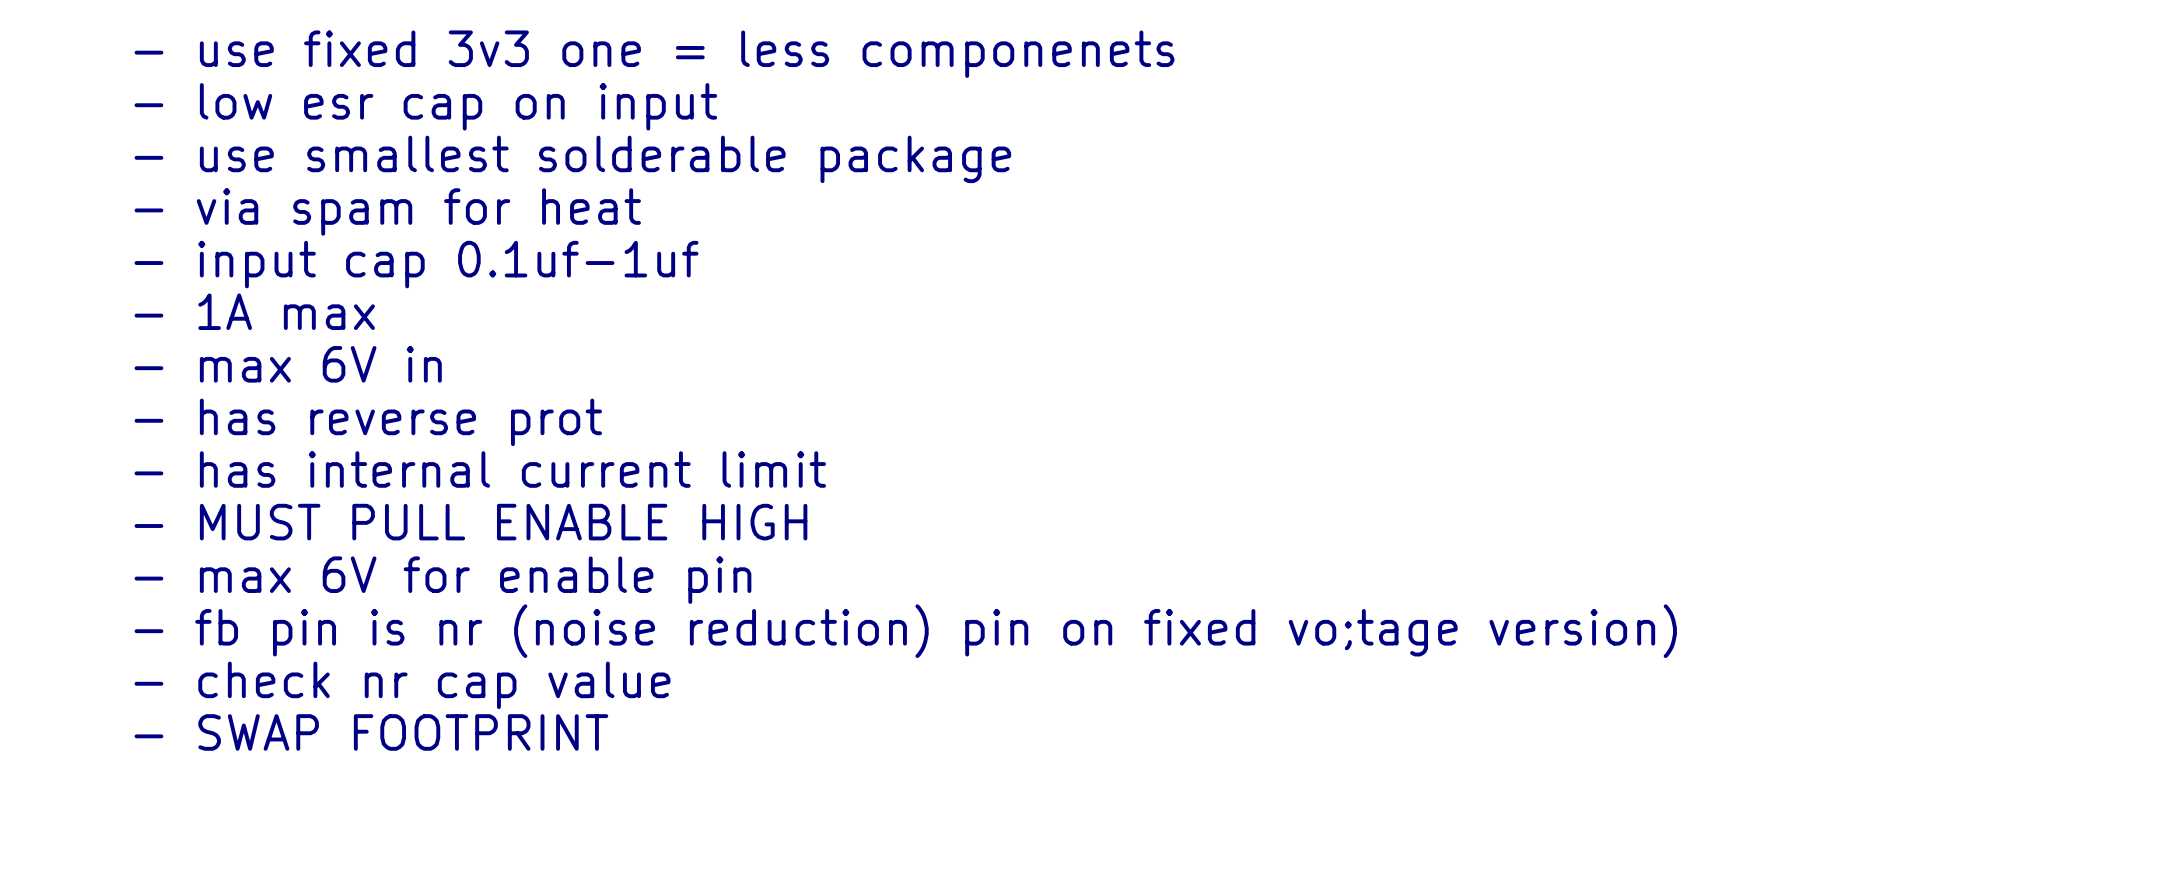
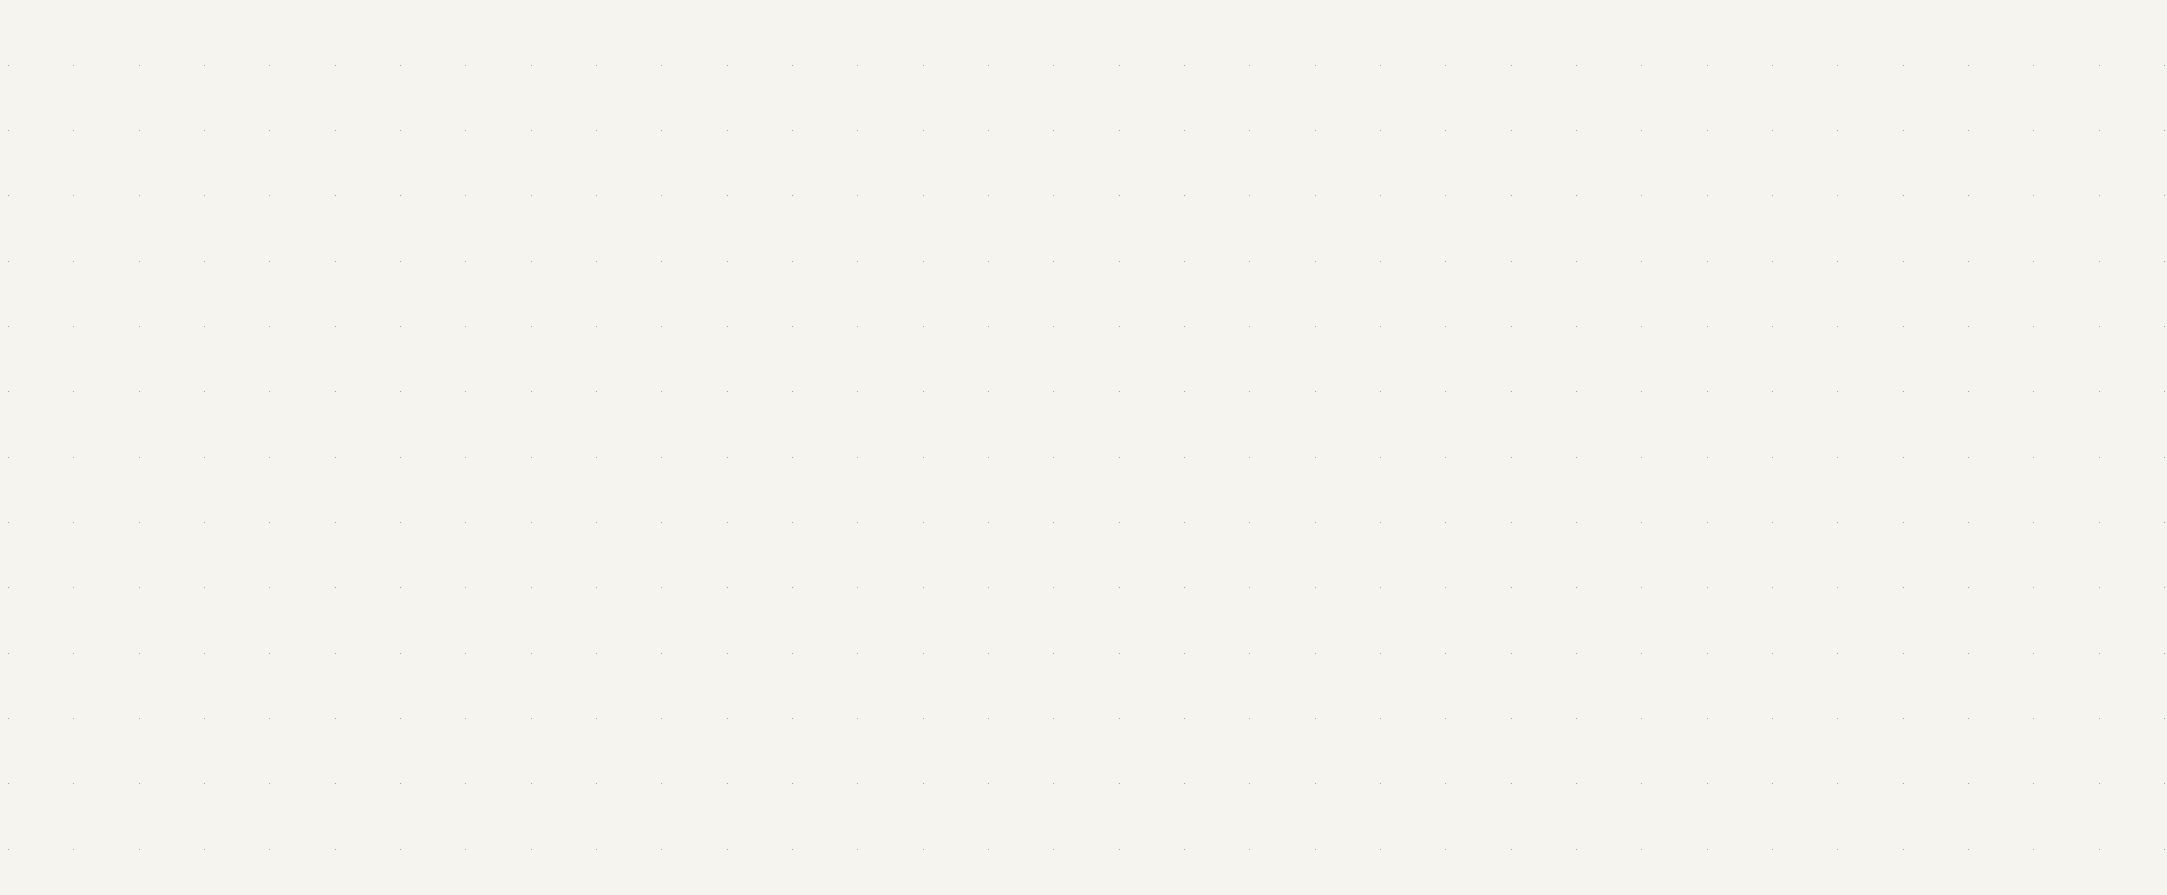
text: - use fixed 3v3 one = less componenets (654, 54) -> none
text: - low esr cap on input (425, 106) -> none
text: - use smallest solderable package (572, 159) -> none
text: - via spam for heat (387, 211) -> none
text: - input cap 0.1uf-1uf (416, 264) -> none
text: - 1A max (254, 311) -> none
text: - max 6V in (288, 364) -> none
text: - has reverse prot (368, 422) -> none
text: - has internal current limit (480, 469) -> none
text: - MUST PULL ENABLE HIGH (470, 522) -> none
text: - max 6V for enable pin (442, 580) -> none
text: - fb pin is nr (noise reduction) pin on fixed vo;tage version) (905, 631) -> none
text: - check nr cap value (402, 685) -> none
text: - SWAP FOOTPRINT (371, 732) -> none

